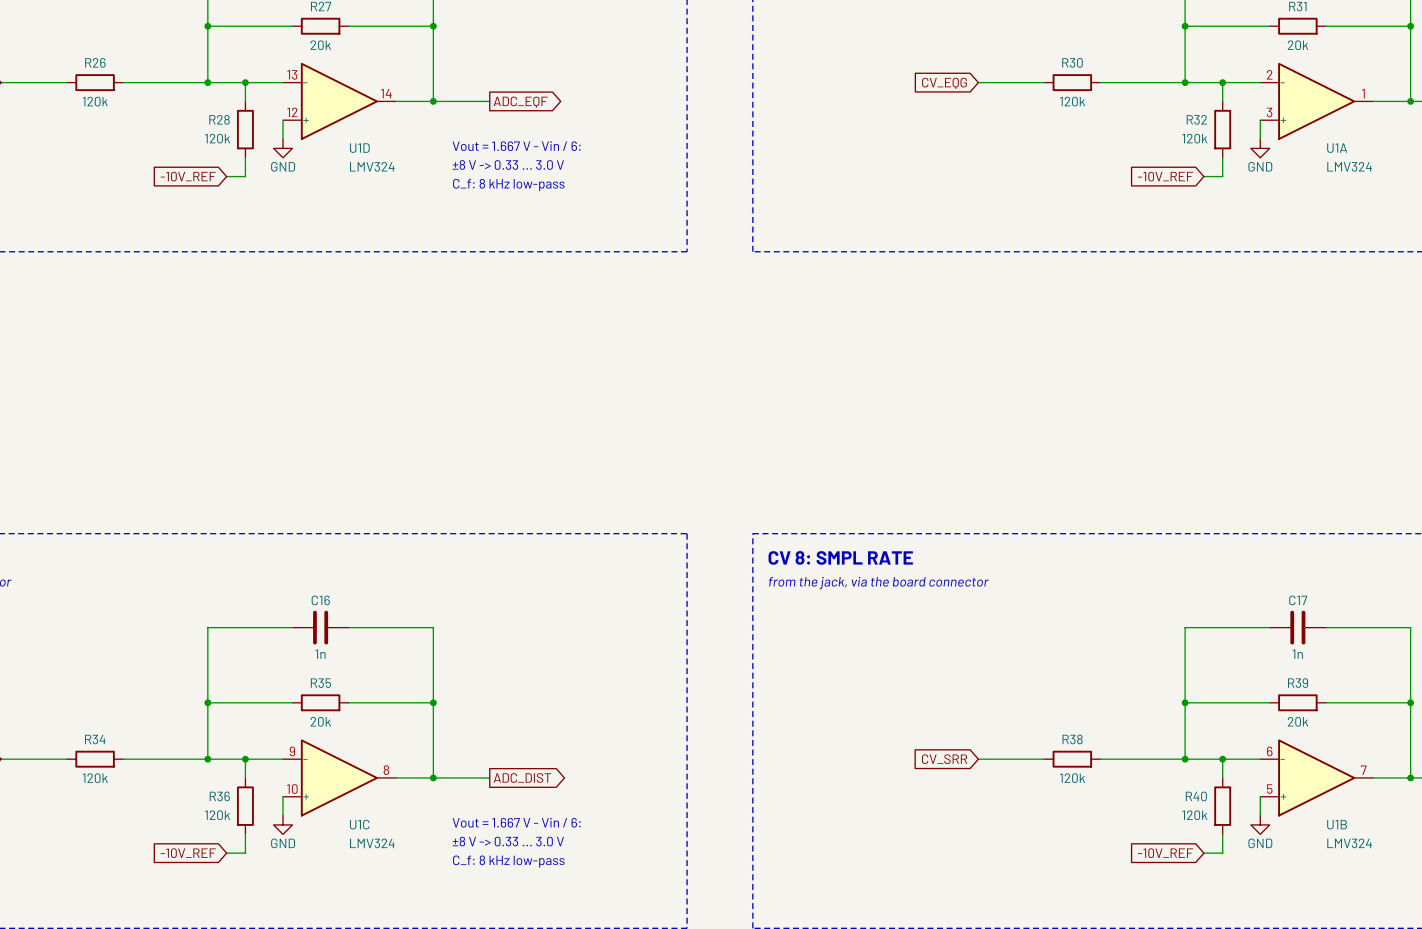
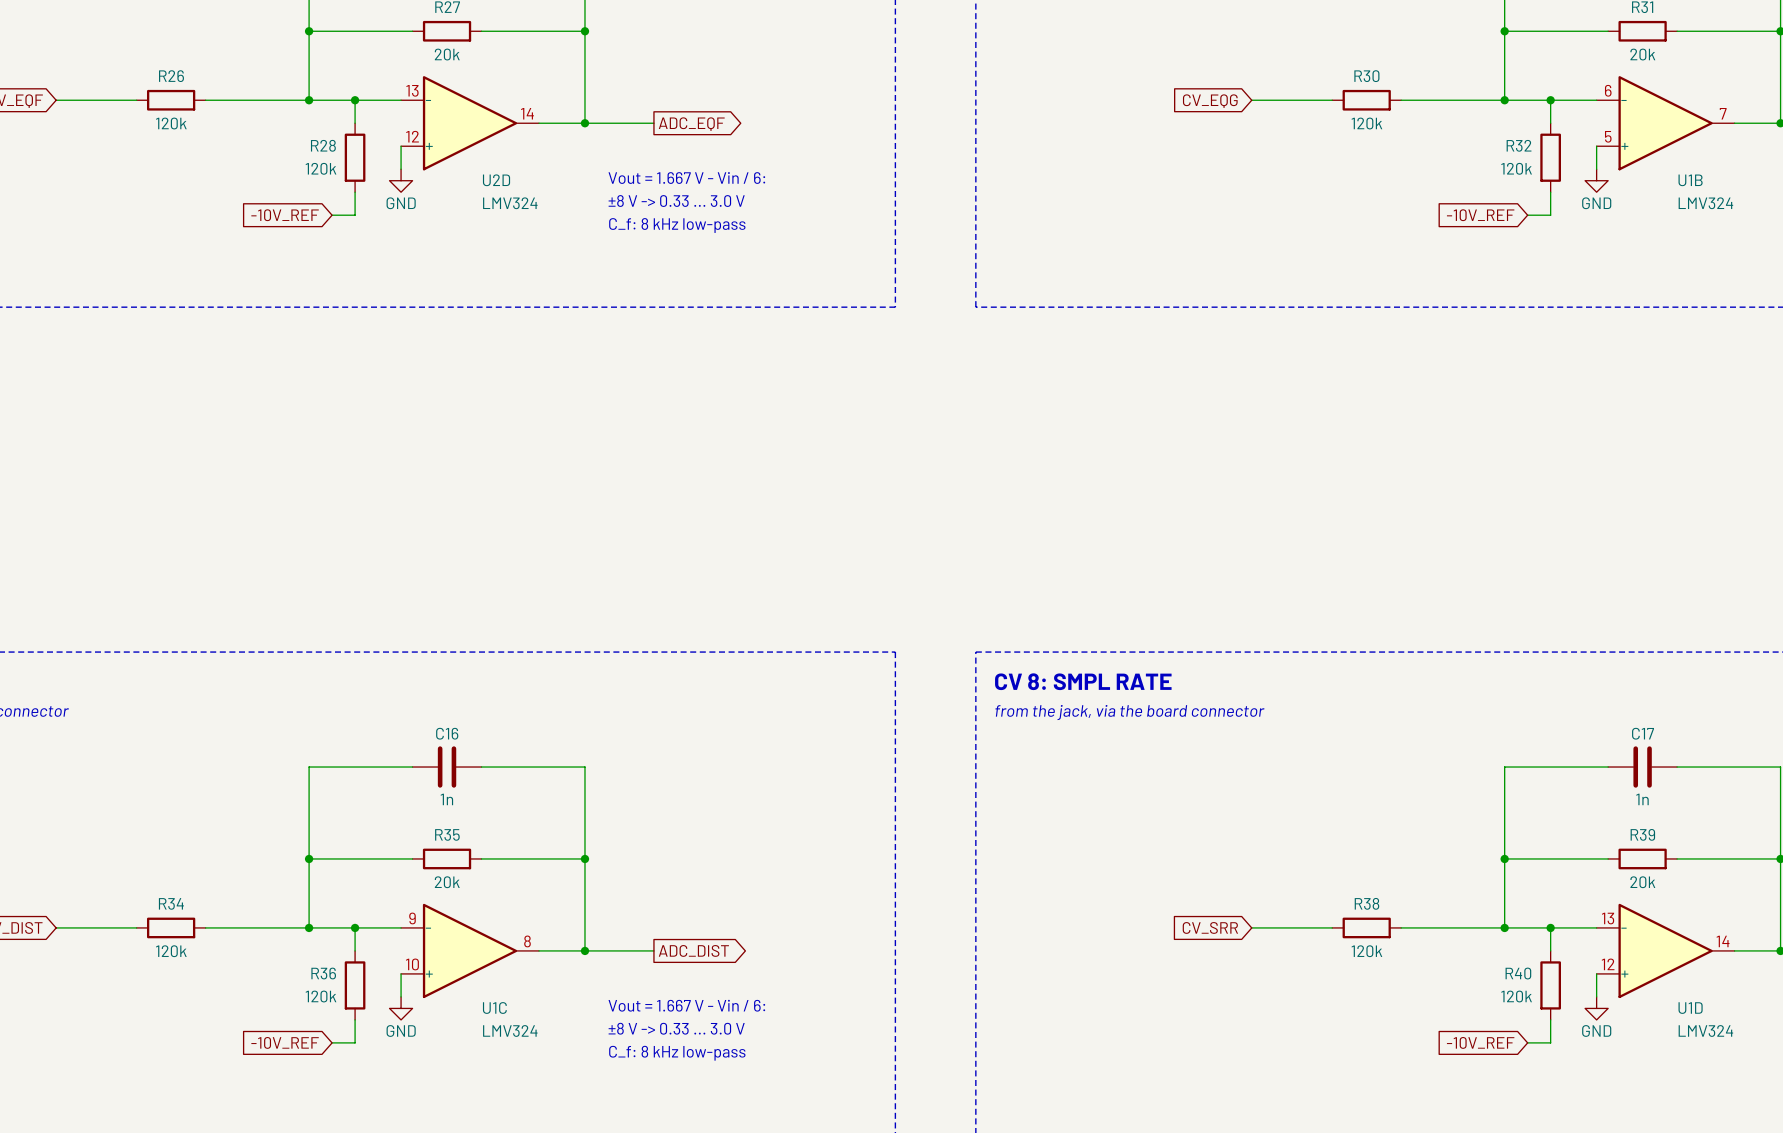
U1A: LMV324 (1316, 101) -> none
U1D name: U1D (359, 148) -> U2D (496, 180)
U1B position: (1316, 777) -> (1665, 123)
U1D: none -> LMV324 (1665, 950)

